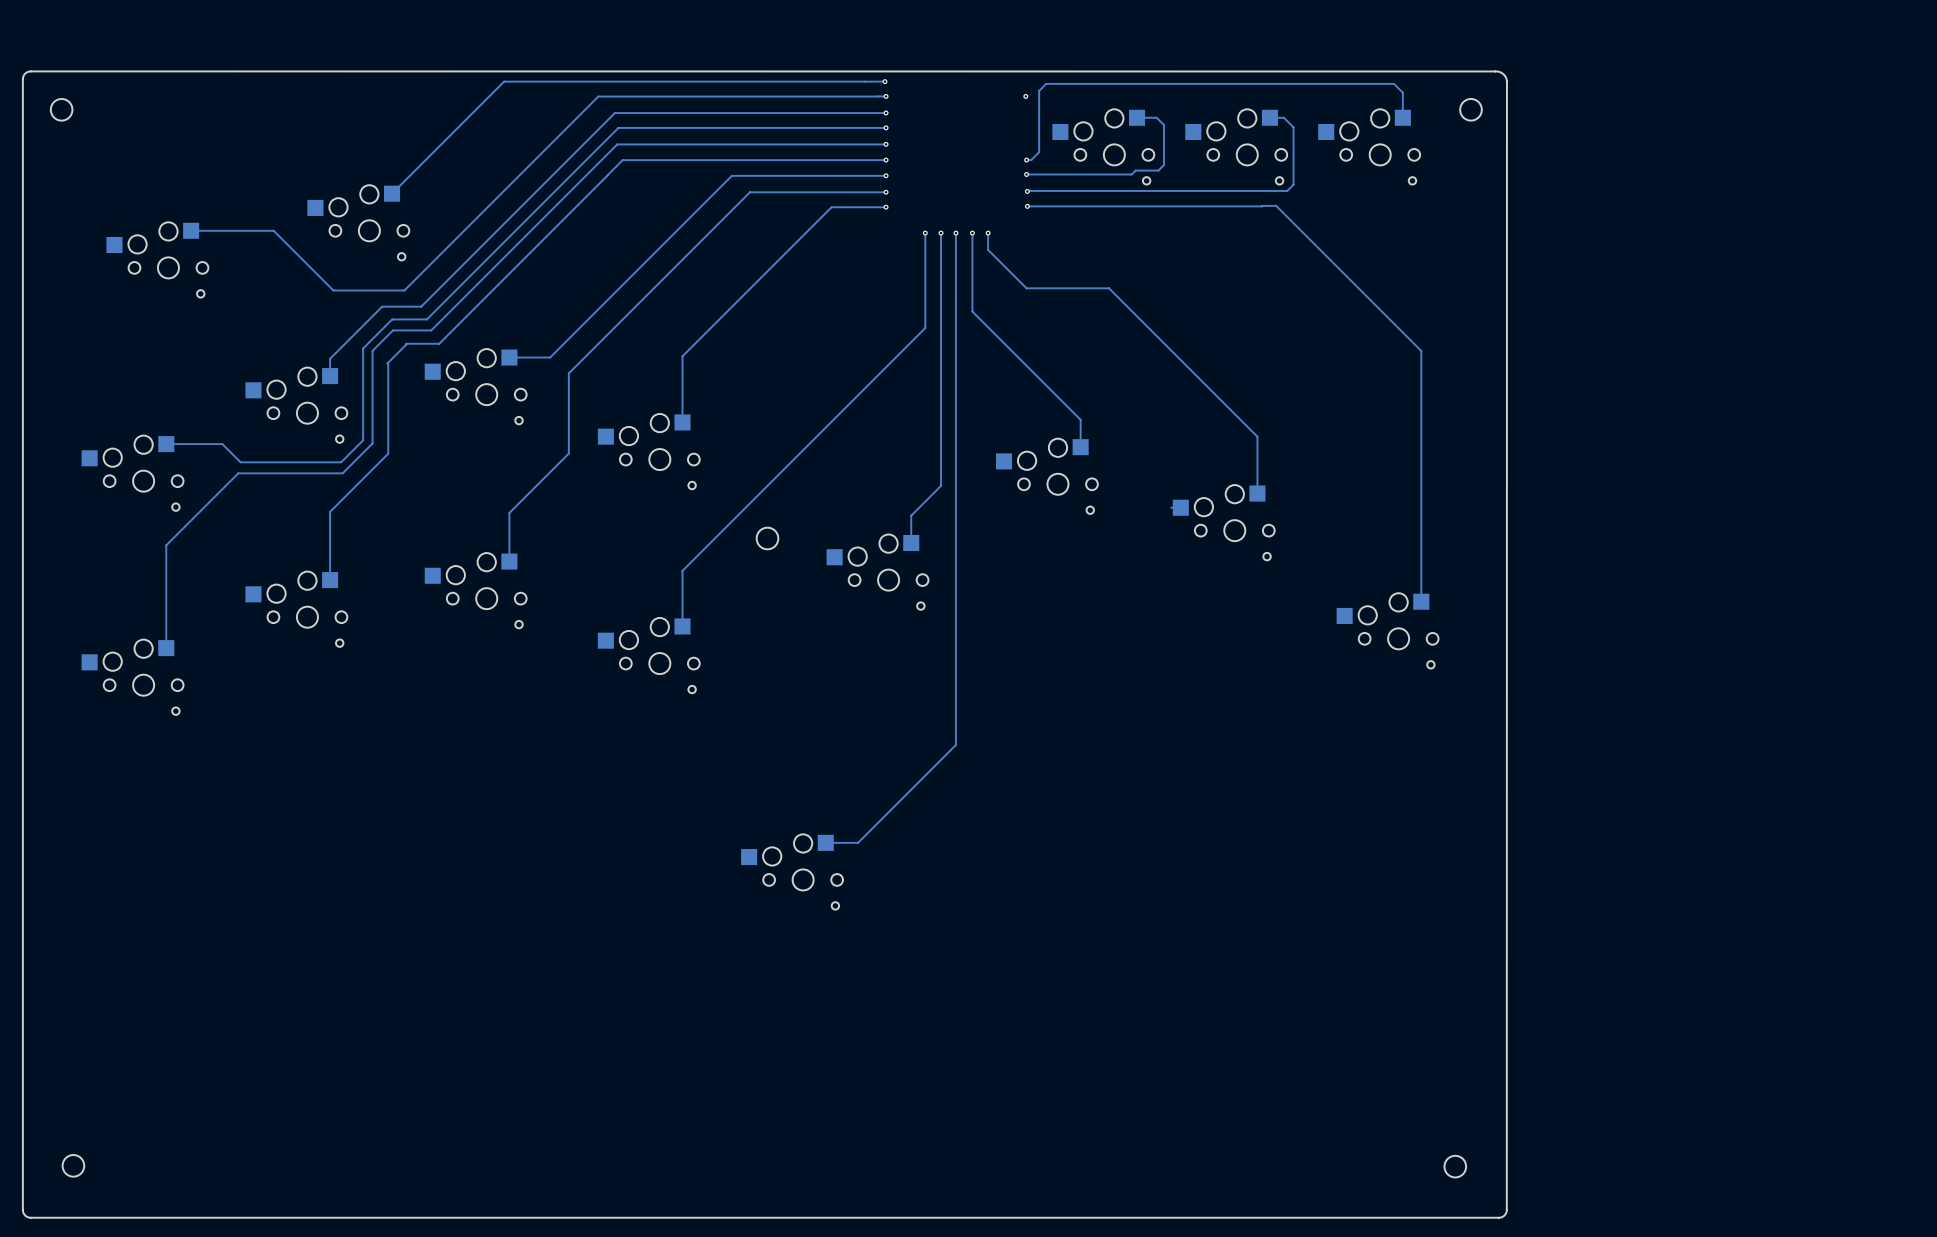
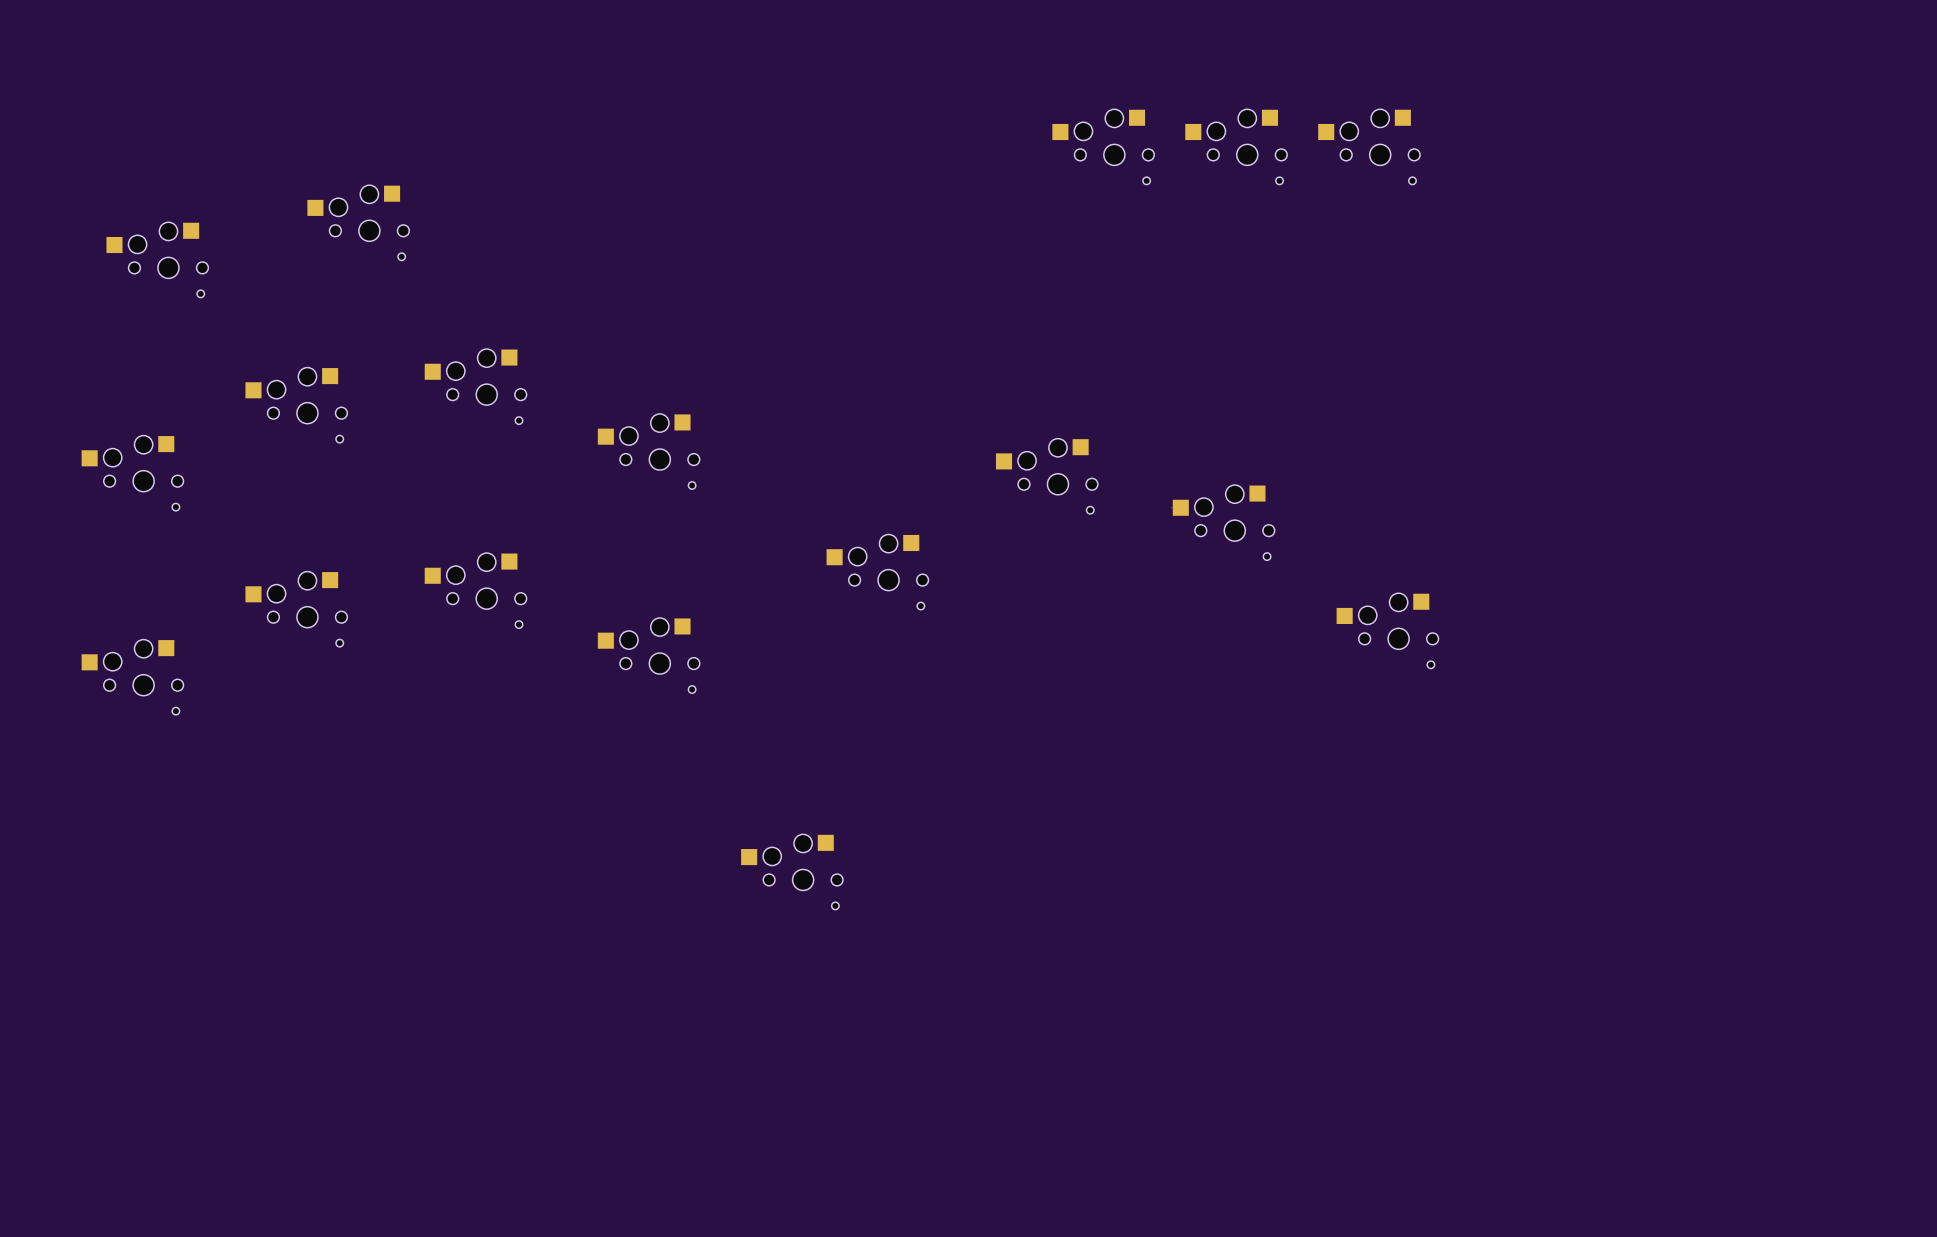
board edge: (1495, 71) (30, 71) (25, 73) (22, 79) (22, 1209) (24, 1214) (30, 1217) (1498, 1217) (1503, 1216) (1506, 1209) (1506, 81) (1503, 73) (1495, 71) -> none
track: (884, 81) (504, 81) (392, 193) -> none
via: (884, 81) -> none
track: (878, 96) (598, 96) (404, 290) (333, 290) (273, 230) (191, 230) -> none
track: (886, 96) (878, 96) -> none
via: (886, 96) -> none
via: (1025, 96) -> none
round board edge: [50, 98, 73, 121] -> none
round board edge: [1459, 98, 1483, 121] -> none
via: (886, 112) -> none
track: (885, 113) (614, 113) (421, 306) (382, 306) (330, 358) (330, 376) -> none
track: (1137, 117) (1156, 117) (1163, 125) (1163, 165) (1158, 170) (1135, 170) (1131, 174) (1026, 174) -> none
track: (1269, 117) (1283, 117) (1293, 127) (1293, 184) (1287, 190) (1027, 191) -> none
track: (1402, 117) (1402, 92) (1394, 83) (1046, 83) (1039, 90) (1039, 152) (1031, 160) (1026, 160) -> none
track: (886, 127) (618, 127) (426, 319) (392, 319) (363, 348) (363, 440) (341, 462) (240, 462) (222, 444) (166, 444) -> none
via: (886, 127) -> none
track: (886, 144) (617, 144) (431, 330) (392, 330) (372, 350) (372, 443) (342, 473) (238, 473) (166, 545) (166, 648) -> none
via: (886, 144) -> none
track: (886, 160) (622, 160) (439, 343) (406, 343) (387, 363) (388, 453) (330, 511) (330, 580) -> none
via: (886, 160) -> none
via: (1026, 160) -> none
via: (1026, 174) -> none
track: (886, 175) (731, 175) (550, 357) (509, 357) -> none
via: (886, 175) -> none
via: (1027, 191) -> none
track: (885, 192) (749, 192) (568, 373) (568, 453) (509, 513) (509, 561) -> none
via: (886, 192) -> none
track: (1027, 206) (1276, 205) (1421, 350) (1421, 601) -> none
via: (1027, 206) -> none
track: (885, 207) (831, 207) (682, 356) (682, 422) -> none
via: (886, 207) -> none
track: (925, 233) (925, 328) (682, 570) (682, 626) -> none
via: (925, 233) -> none
track: (940, 233) (940, 485) (911, 515) (911, 543) -> none
via: (941, 233) -> none
track: (955, 233) (955, 744) (858, 842) (825, 842) -> none
via: (955, 233) -> none
track: (972, 233) (972, 311) (1080, 419) (1080, 447) -> none
via: (972, 233) -> none
track: (988, 233) (988, 249) (1026, 288) (1109, 288) (1257, 436) (1257, 493) -> none
via: (988, 233) -> none
round board edge: [756, 527, 779, 550] -> none
round board edge: [62, 1154, 85, 1177] -> none
round board edge: [1444, 1155, 1467, 1178] -> none

